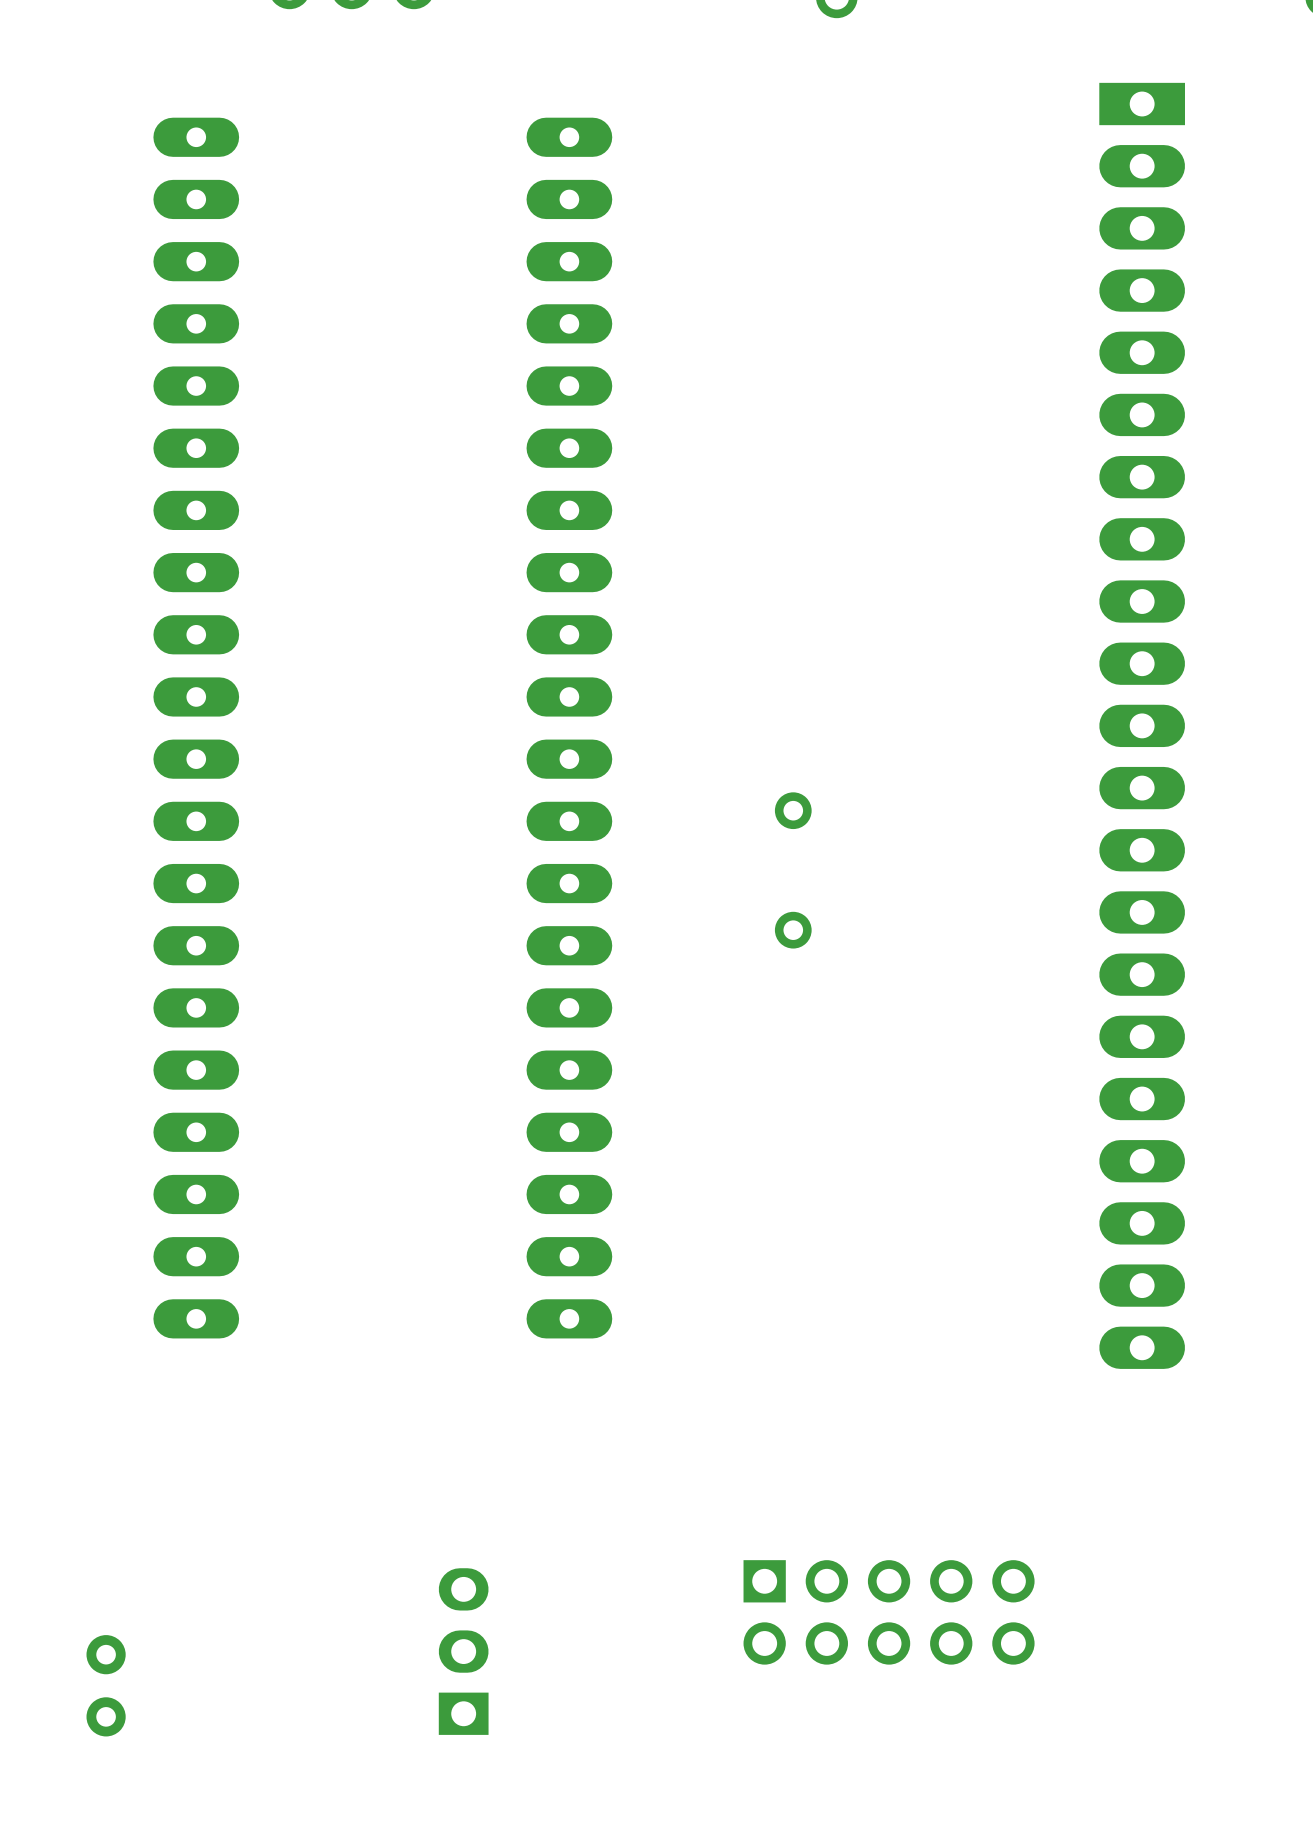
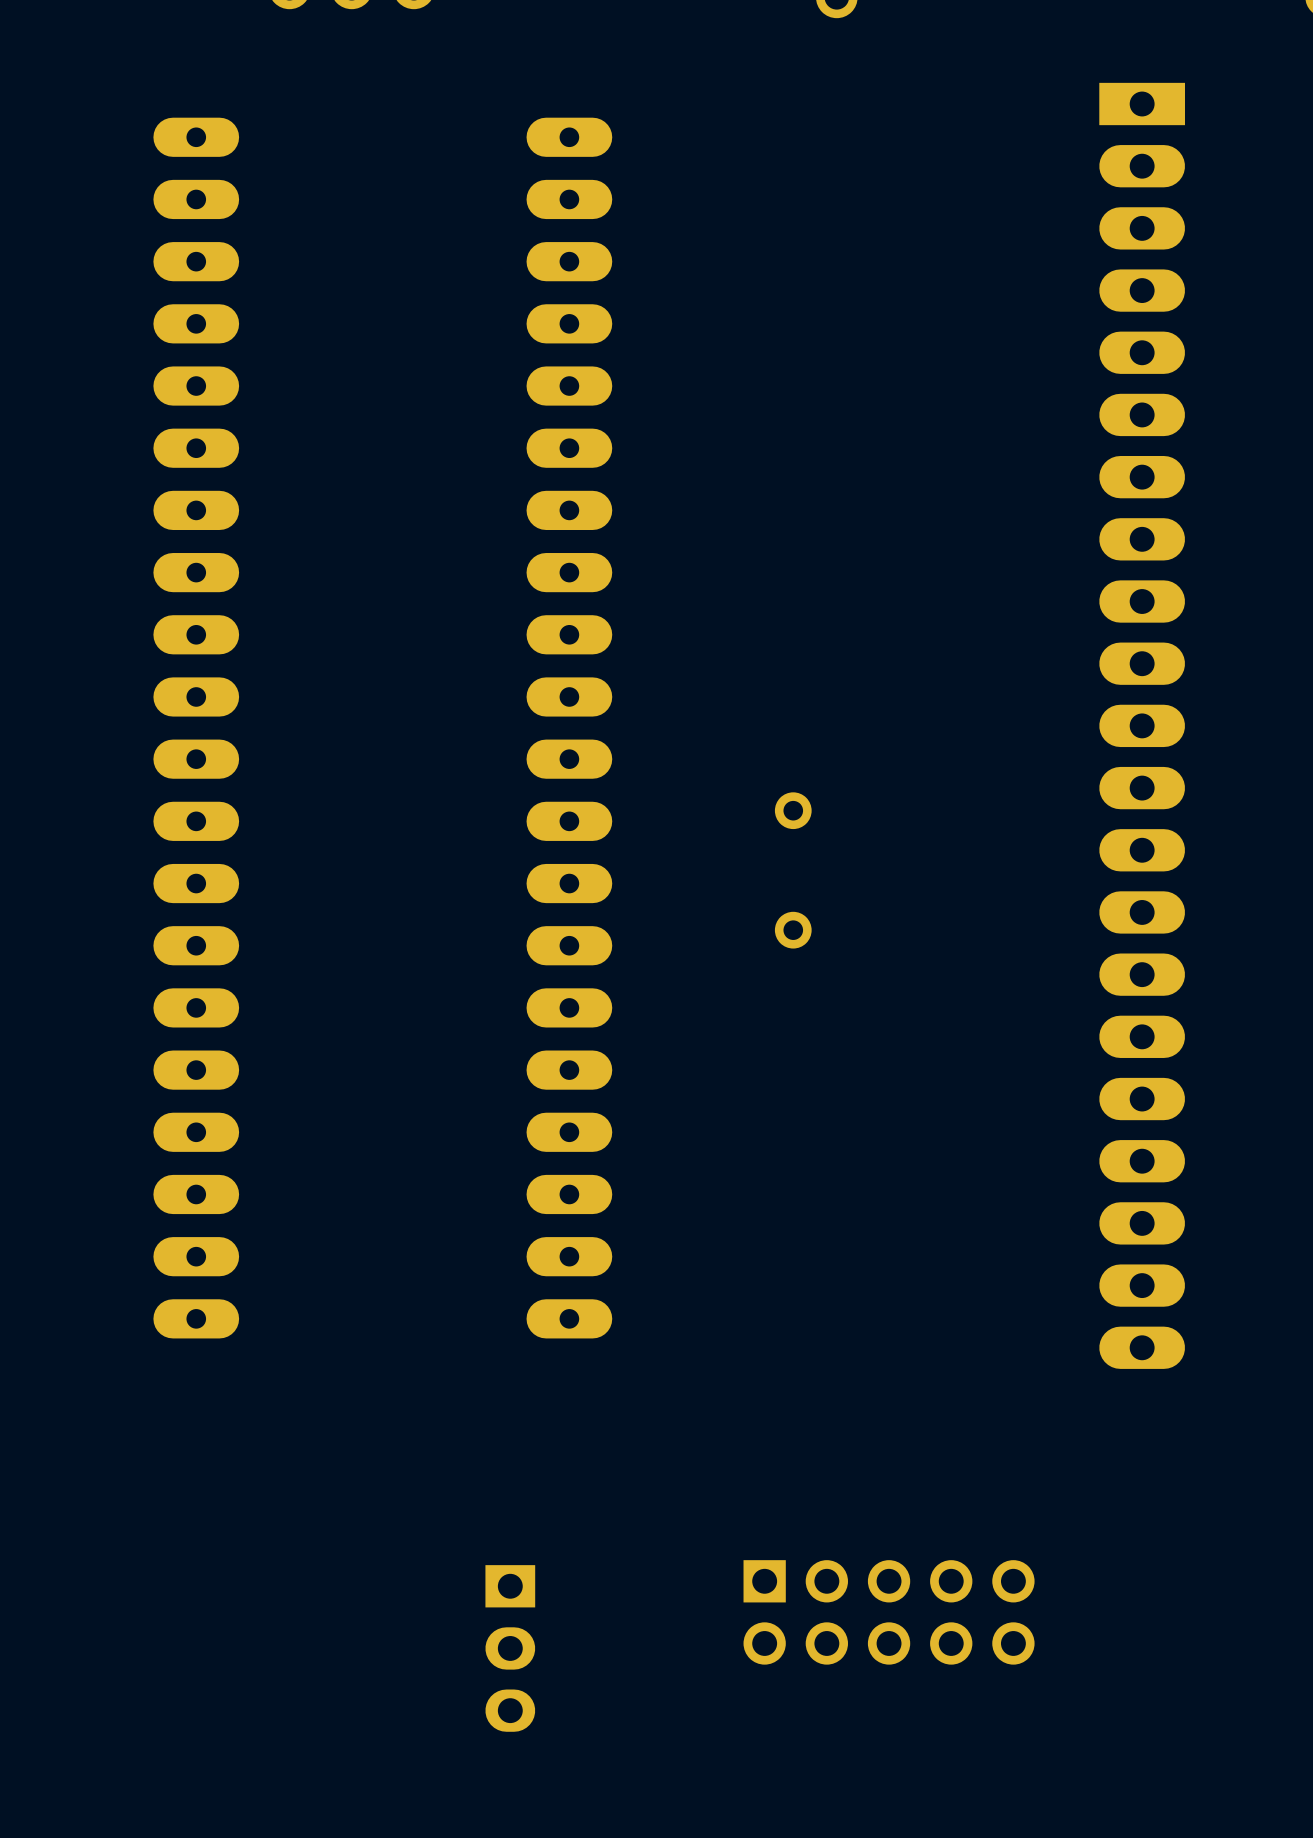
part rotation: 0° (463, 1651) -> 180° (510, 1648)
part: (106, 1685) -> none

